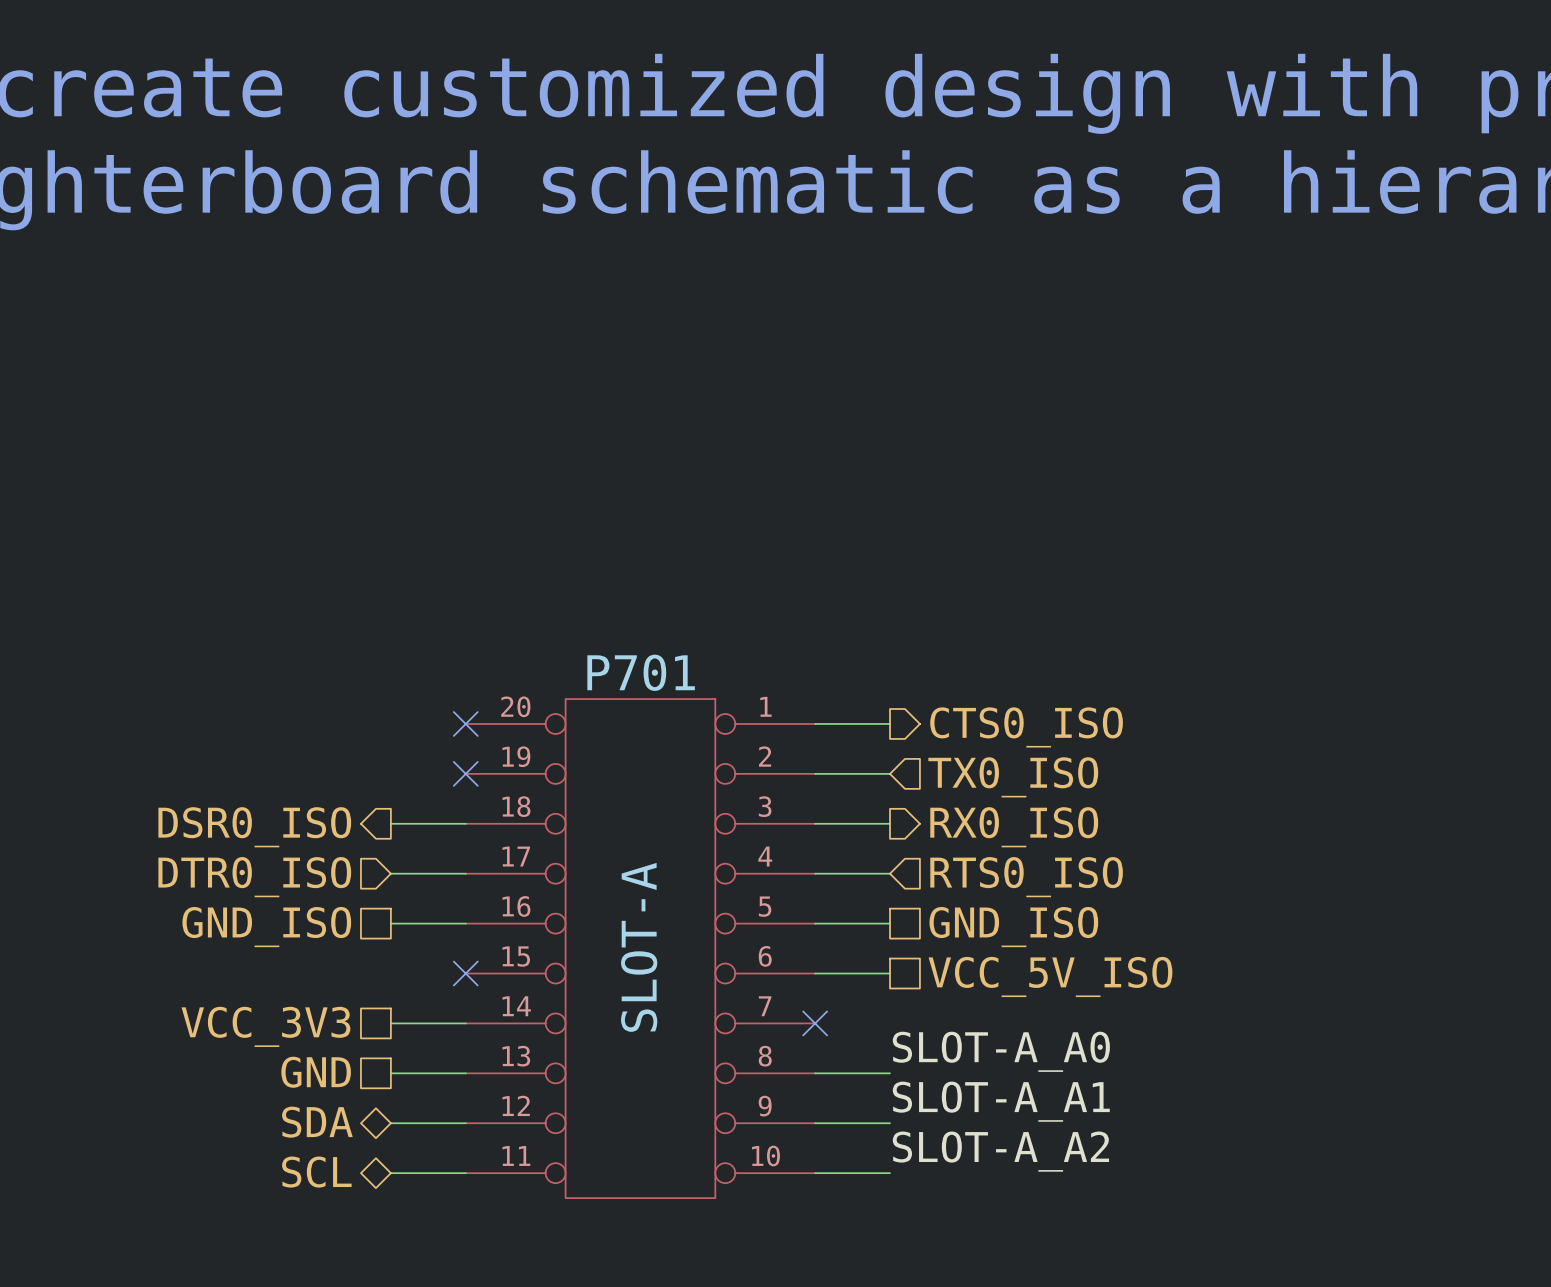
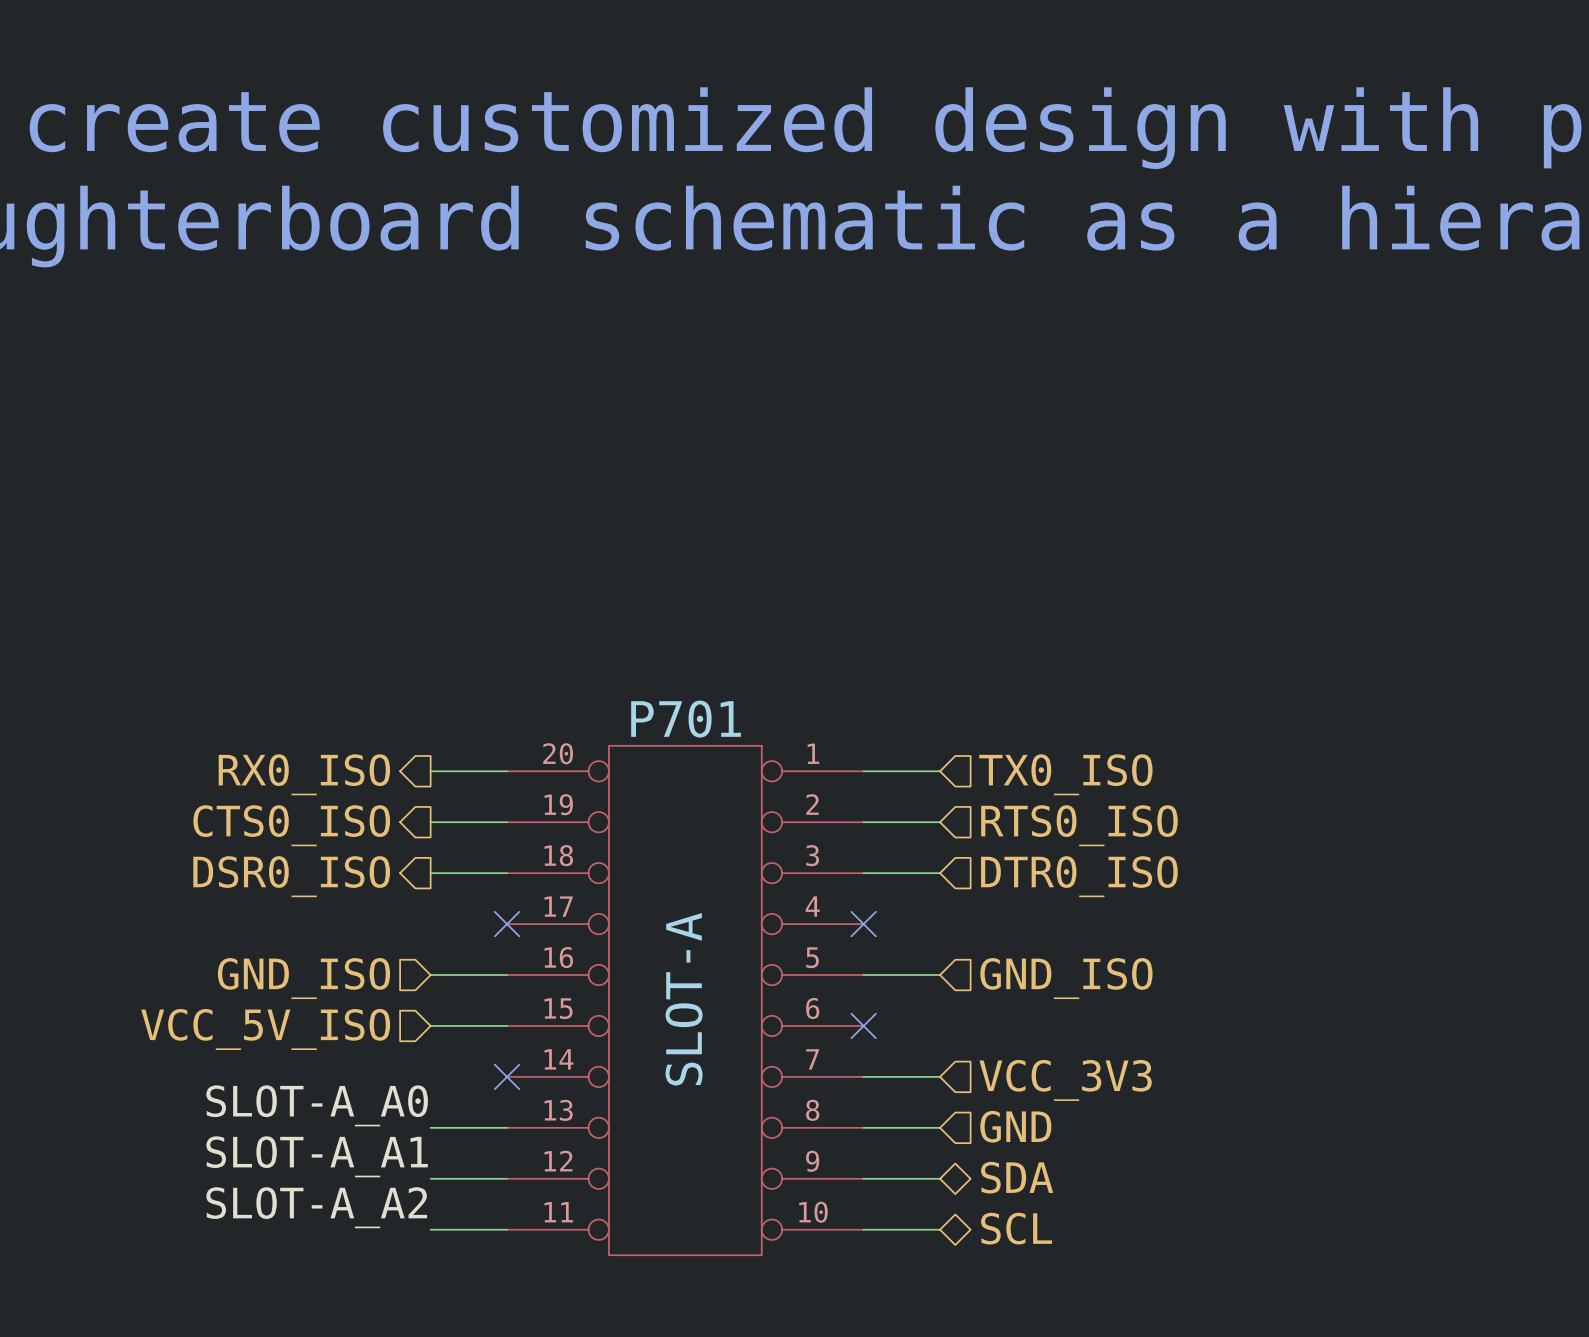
no-connect mark: (465, 723) -> none
hierarchical label: none -> RX0_ISO (304, 774)
hierarchical label shape: output (1026, 727) -> input (1065, 774)
hierarchical label: CTS0_ISO (1026, 727) -> TX0_ISO (1065, 774)
no-connect mark: (465, 773) -> none
hierarchical label: none -> CTS0_ISO (291, 825)
hierarchical label: TX0_ISO (1013, 777) -> RTS0_ISO (1079, 825)
hierarchical label shape: output (1014, 827) -> input (1079, 876)
hierarchical label: RX0_ISO (1014, 827) -> DTR0_ISO (1079, 876)
wire: (390, 873) (465, 873) -> (430, 822) (507, 822)
no-connect mark: none -> (507, 924)
wire: (815, 873) (890, 873) -> (430, 771) (507, 771)
no-connect mark: none -> (863, 924)
hierarchical label: DTR0_ISO (254, 877) -> none
hierarchical label: RTS0_ISO (1026, 877) -> none
hierarchical label shape: passive (266, 927) -> input (303, 978)
hierarchical label shape: passive (1013, 927) -> input (1066, 978)
no-connect mark: (465, 973) -> none
wire: (815, 973) (890, 973) -> (863, 1076) (940, 1076)
hierarchical label: none -> VCC_5V_ISO (265, 1029)
hierarchical label: VCC_5V_ISO (1050, 976) -> none
wire: (390, 1023) (465, 1023) -> (430, 1025) (507, 1025)
no-connect mark: none -> (507, 1076)
no-connect mark position: (815, 1023) -> (863, 1025)
hierarchical label: VCC_3V3 (265, 1026) -> none
hierarchical label: none -> VCC_3V3 (1065, 1080)
label: none -> SLOT-A_A0 (317, 1105)
label: SLOT-A_A0 (1001, 1051) -> none
hierarchical label: GND (316, 1072) -> none
hierarchical label: none -> GND (1015, 1126)
label: none -> SLOT-A_A1 (317, 1156)
label: SLOT-A_A1 (1001, 1101) -> none
hierarchical label: SDA (317, 1122) -> none
hierarchical label: none -> SDA (1017, 1177)
label: none -> SLOT-A_A2 (316, 1207)
label: SLOT-A_A2 (1000, 1151) -> none
hierarchical label: SCL (316, 1172) -> none
hierarchical label: none -> SCL (1016, 1228)

